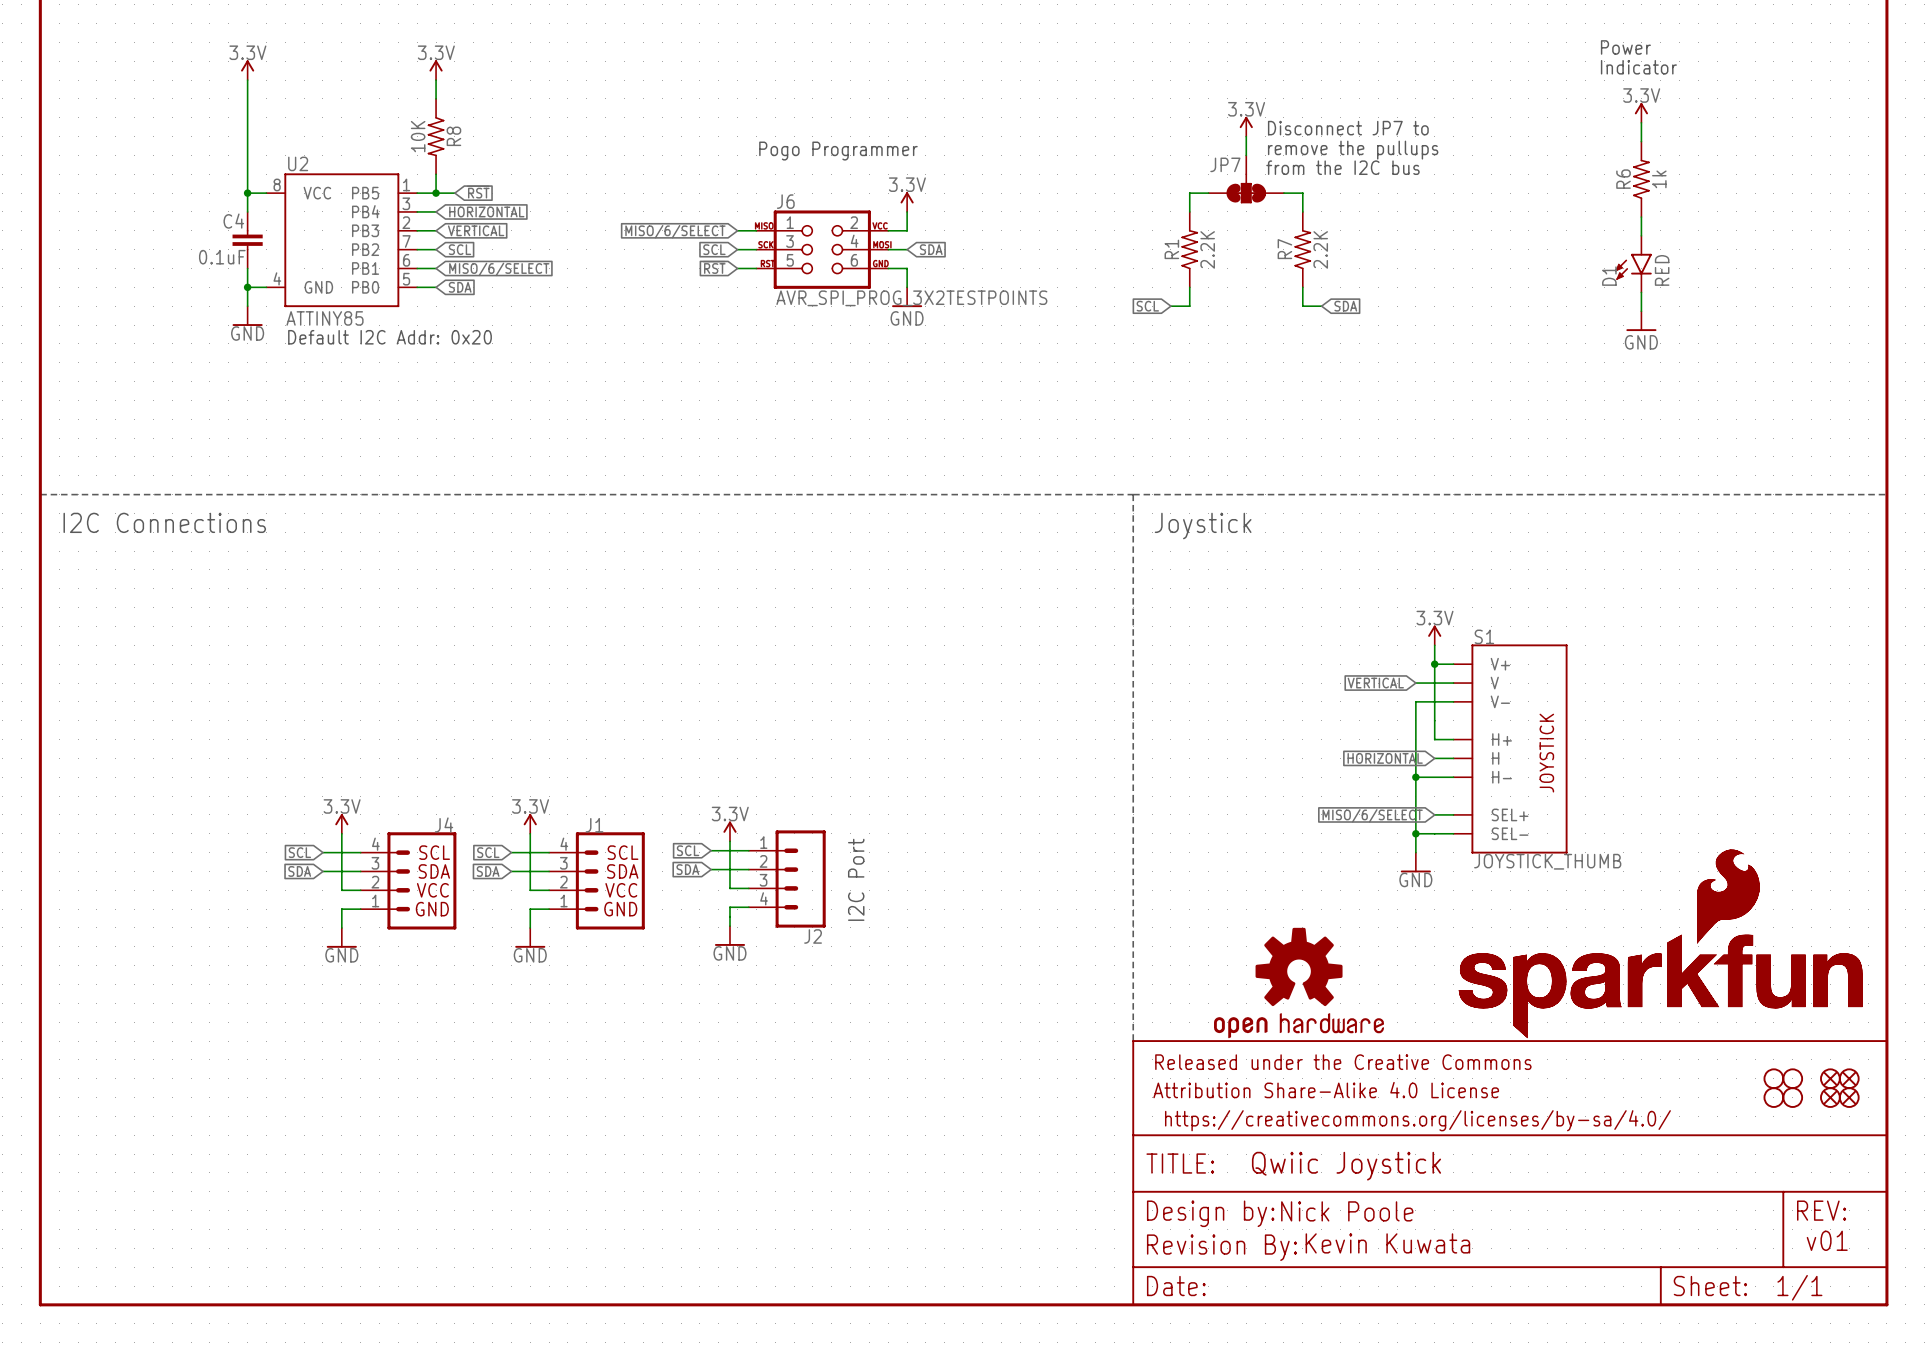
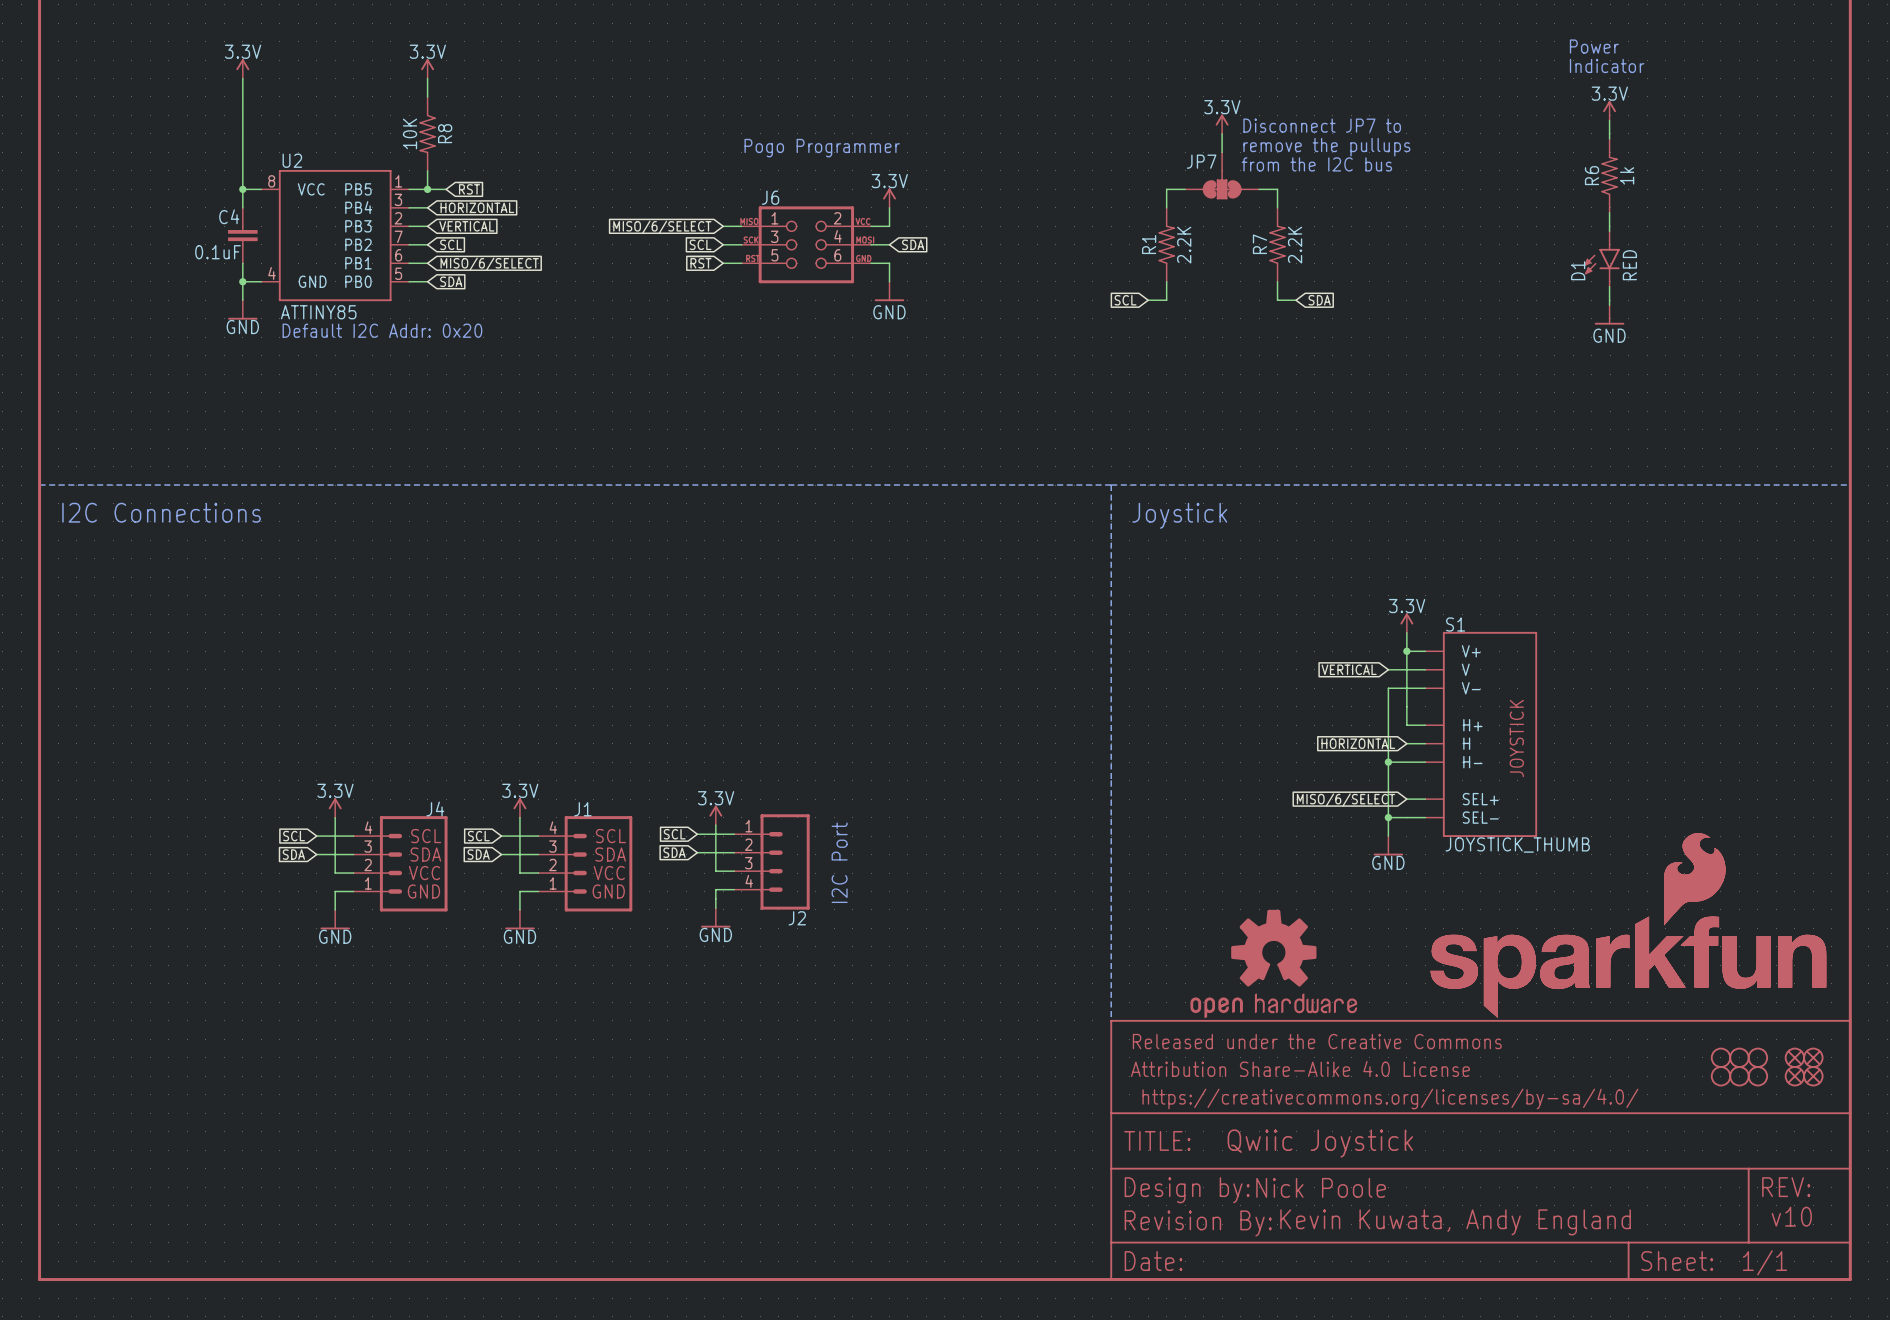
J6 value: AVR_SPI_PROG_3X2TESTPOINTS (911, 298) -> none
part: none -> (1720, 1057)
part: none -> (1720, 1076)
text: v01 (1827, 1240) -> v10 (1791, 1216)
text: Kevin Kuwata (1387, 1243) -> Kevin Kuwata, Andy England (1455, 1222)

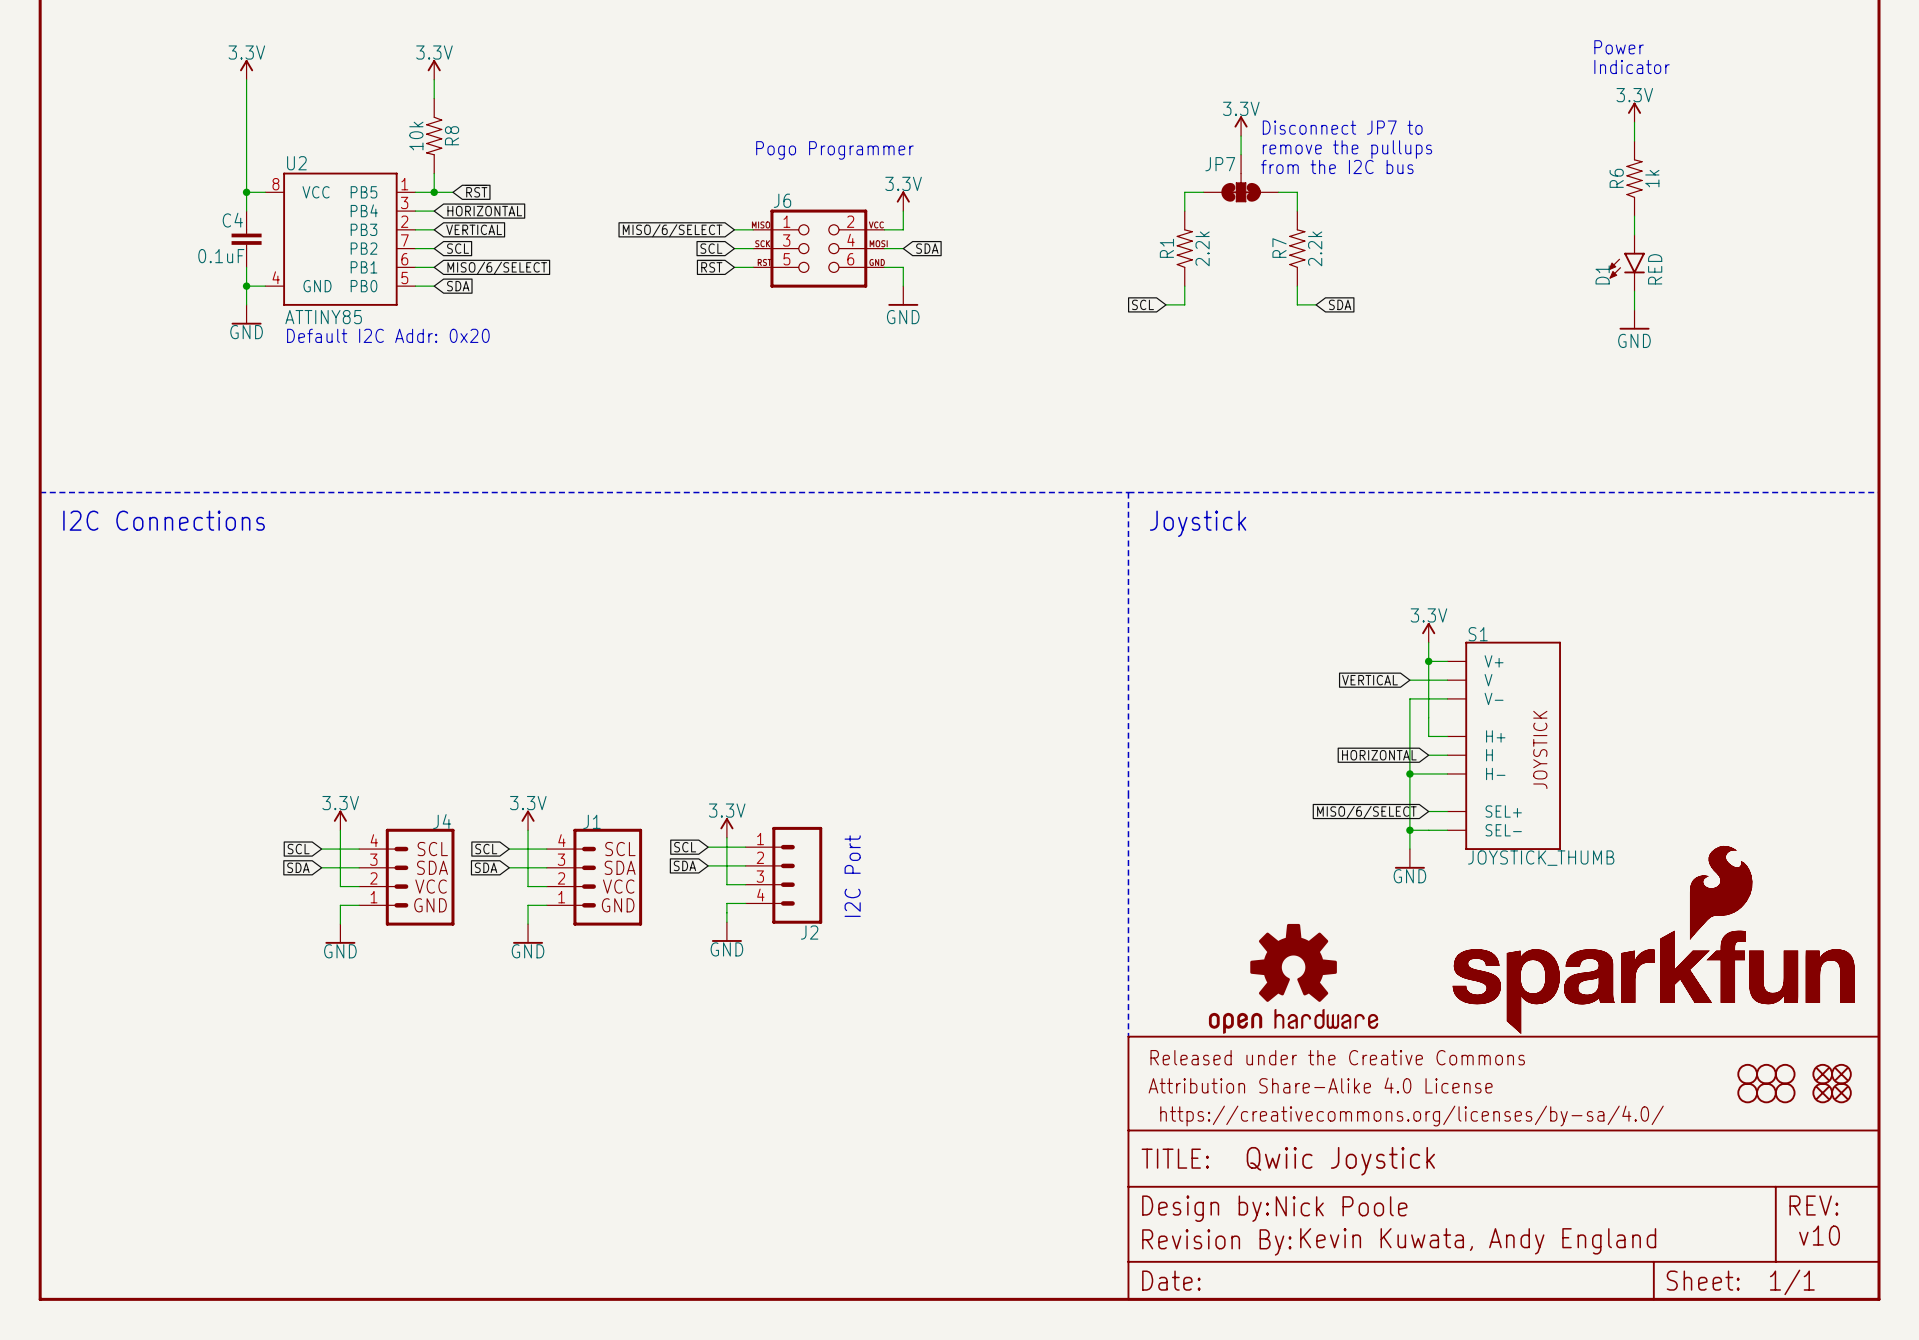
R8 value: 10K (410, 133) -> 10k (416, 136)
R1 value: 2.2K (1184, 245) -> 2.2k (1202, 248)
R7 value: 2.2K (1295, 245) -> 2.2k (1315, 248)

